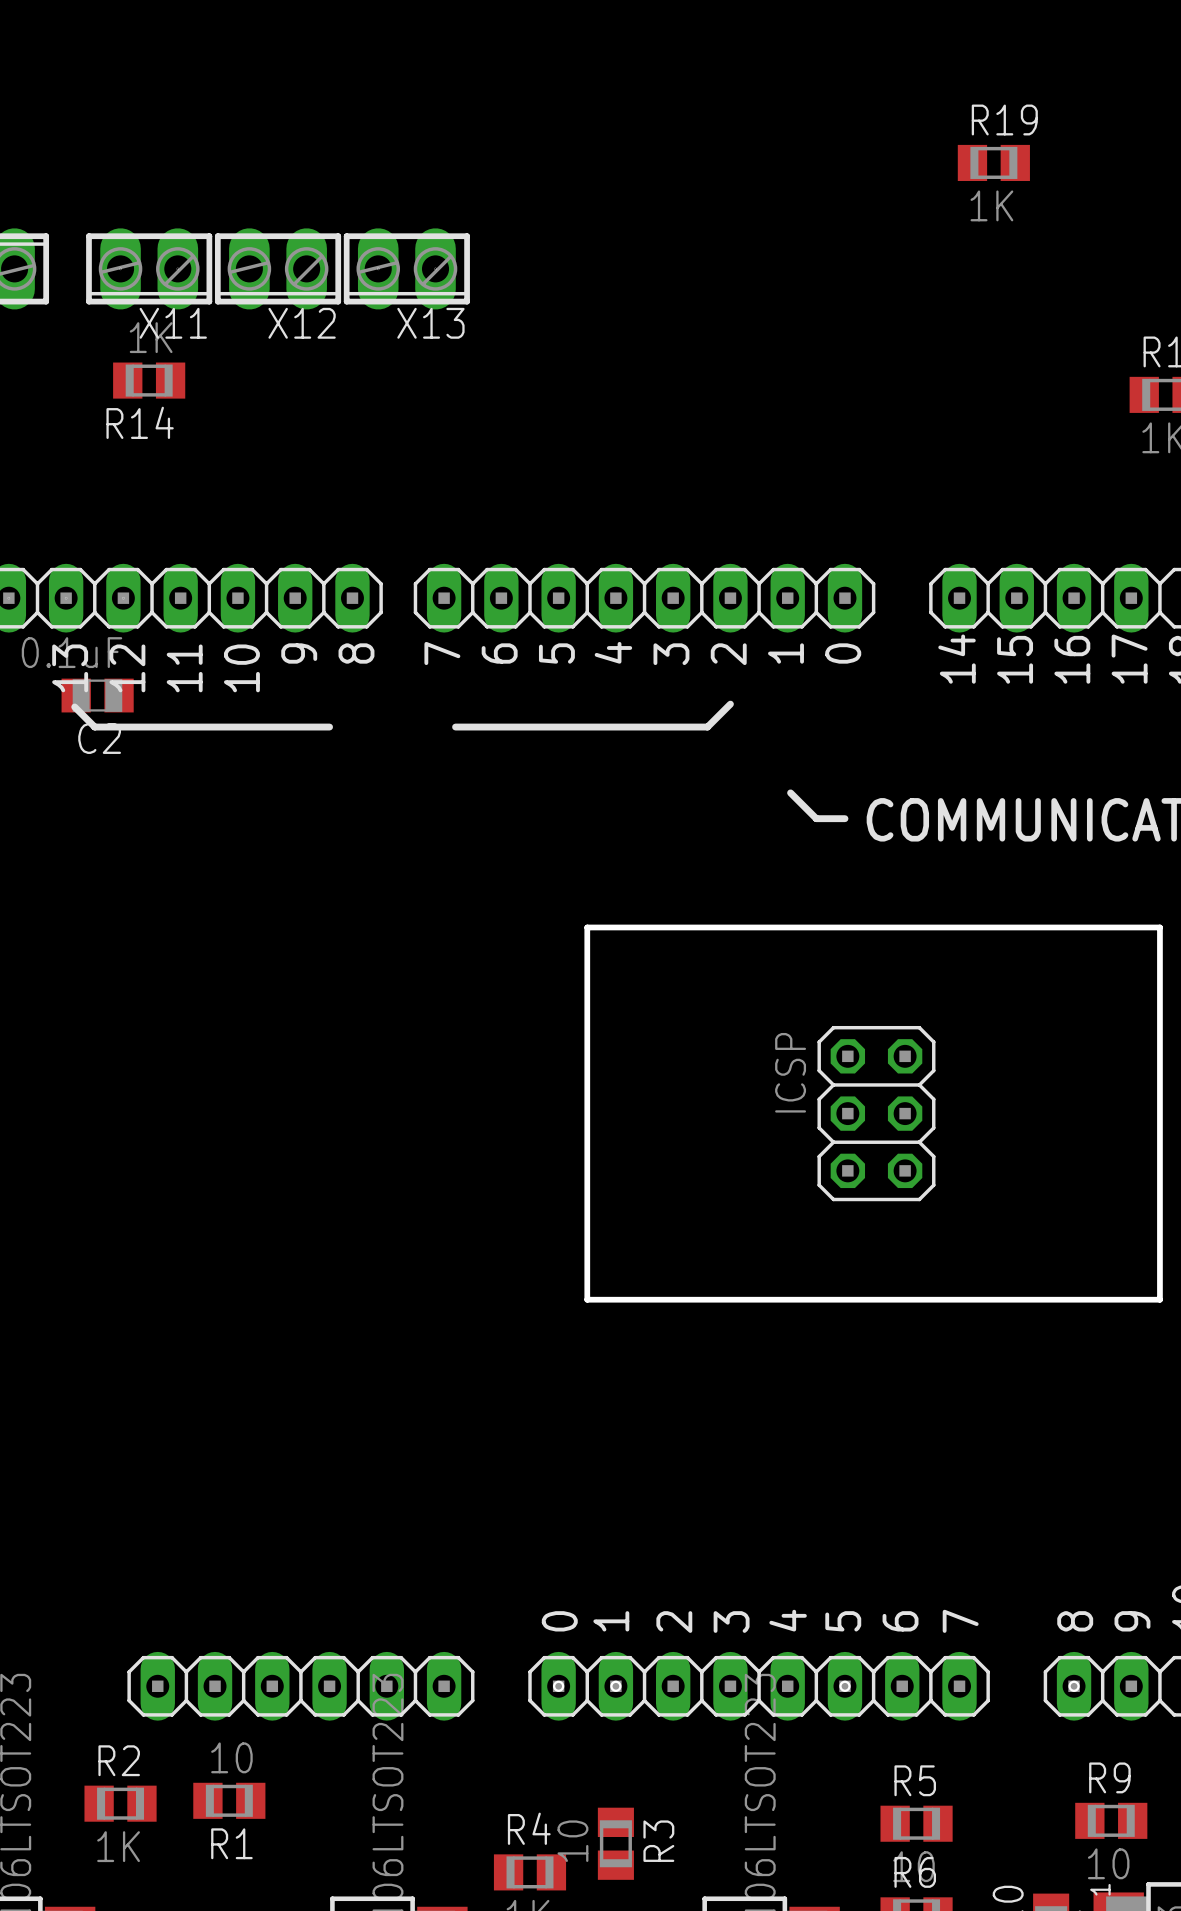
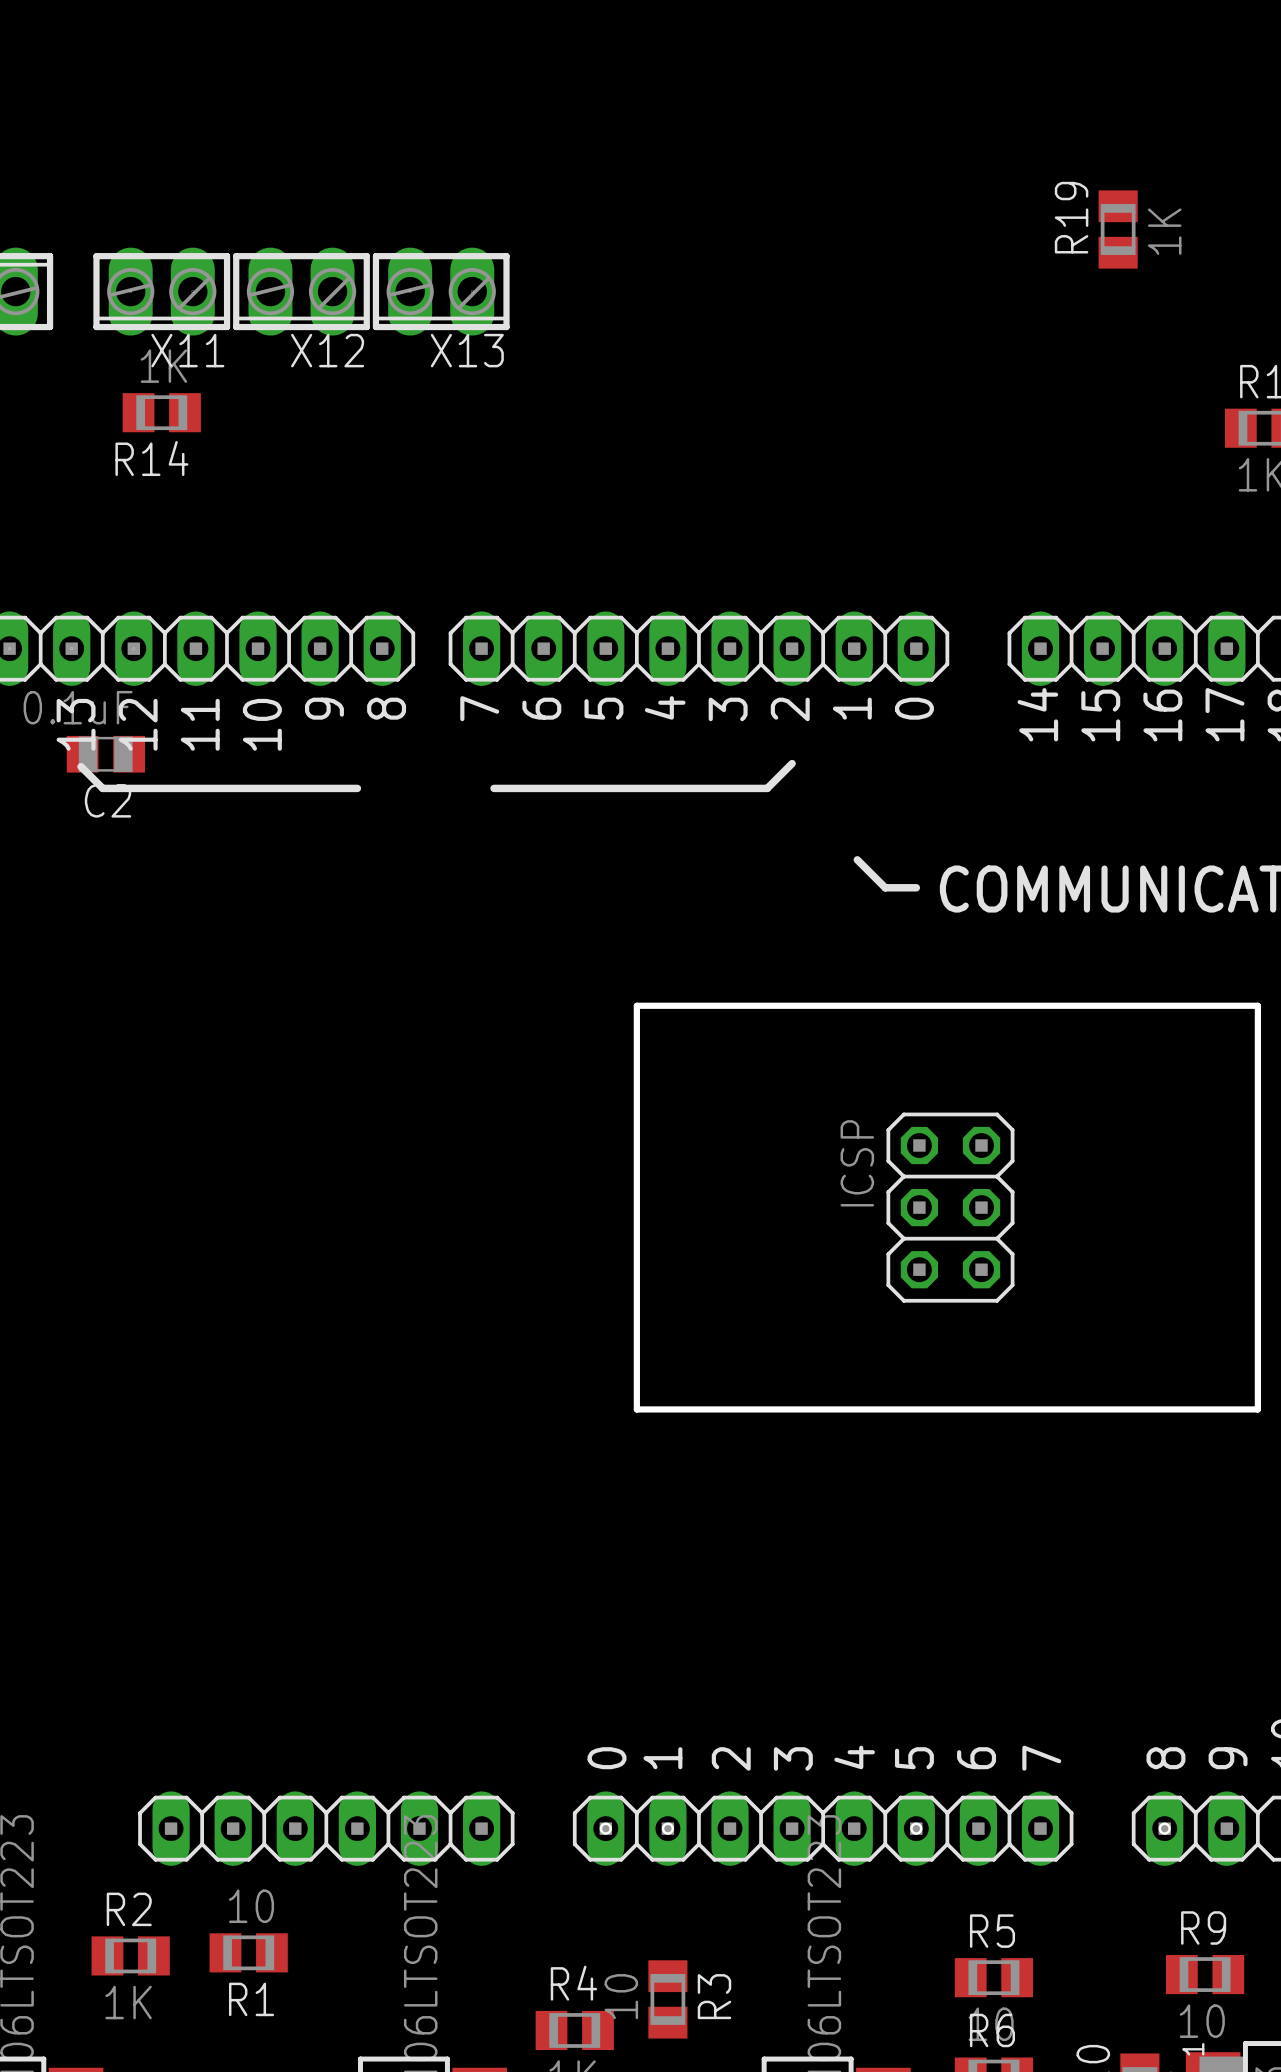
R19 name position: R19 (1004, 120) -> R19 (1071, 217)
R19 rotation: 0° (993, 162) -> 90° clockwise (1118, 229)
R19 position: (993, 162) -> (1118, 229)
R19 value position: 1K (991, 205) -> 1K (1164, 231)

